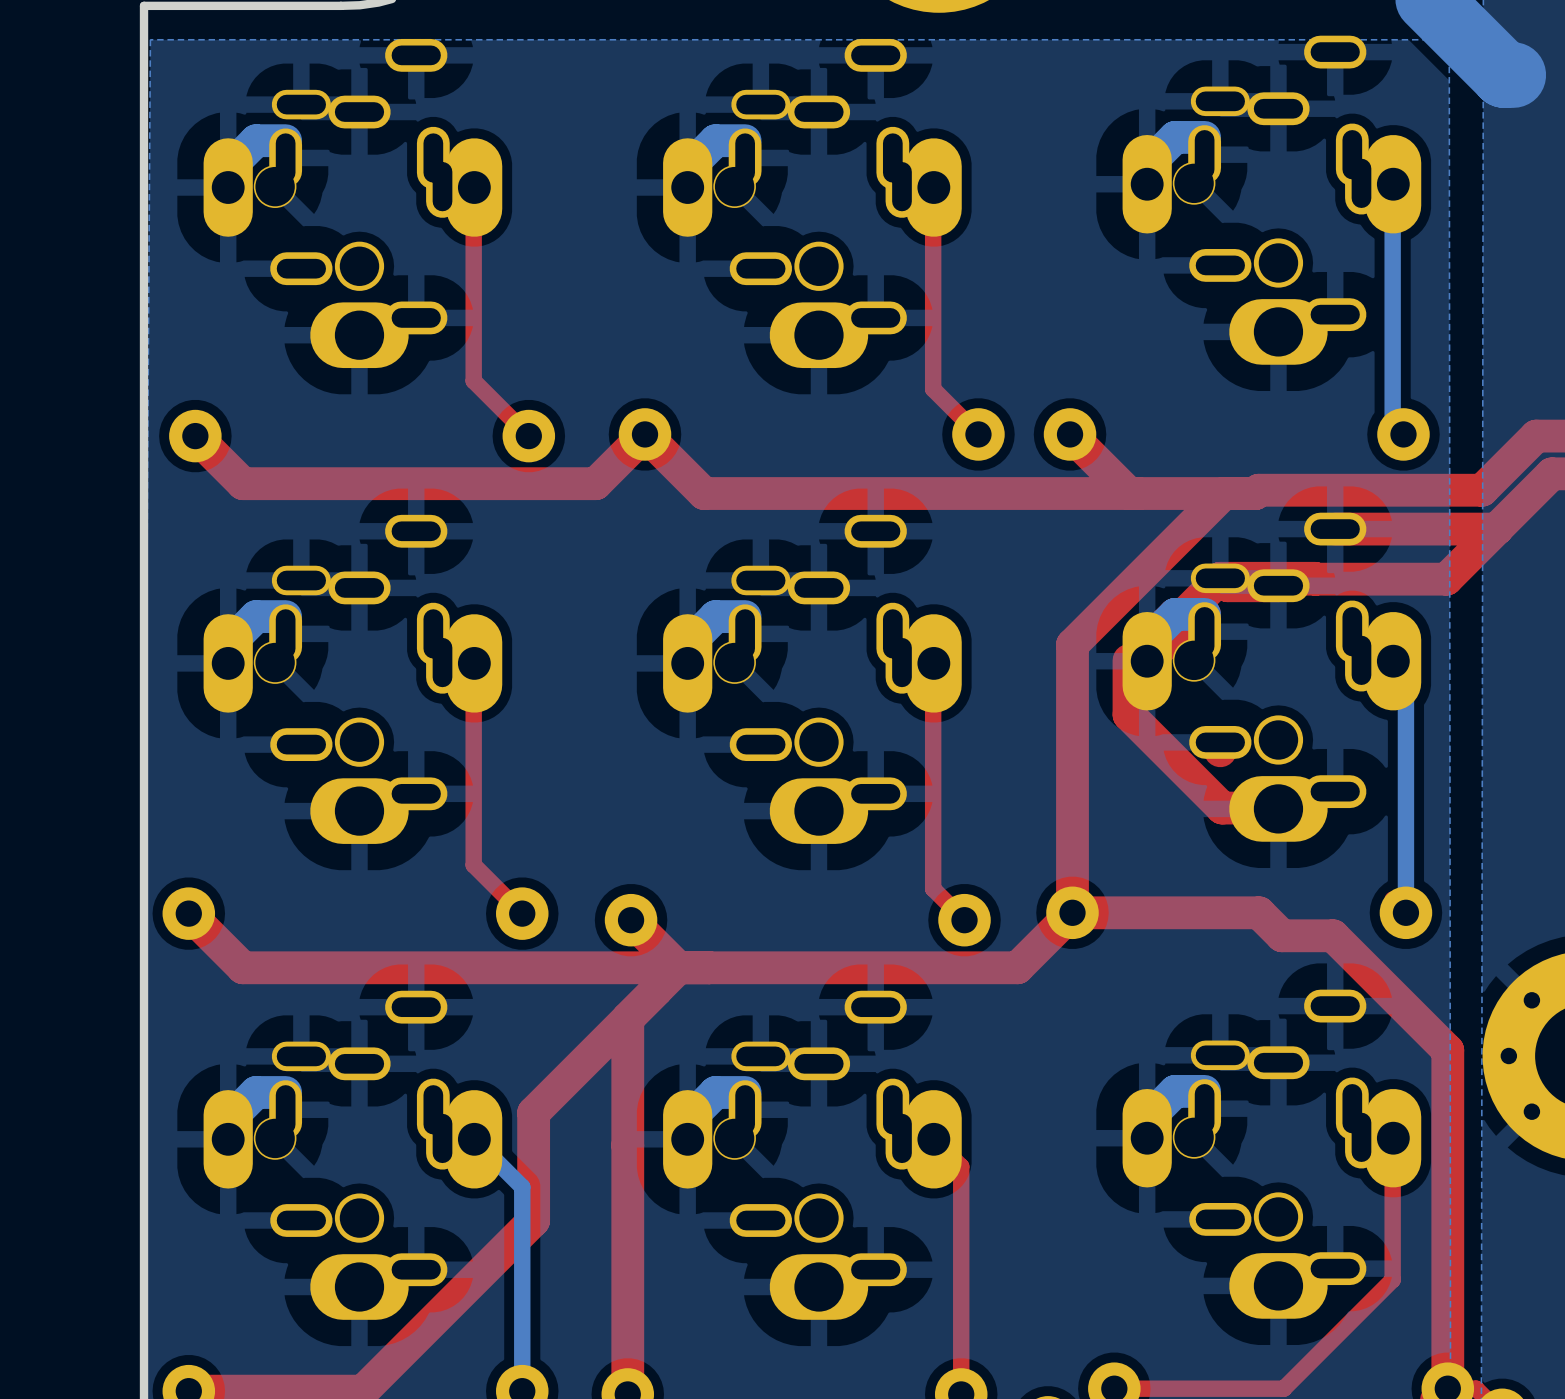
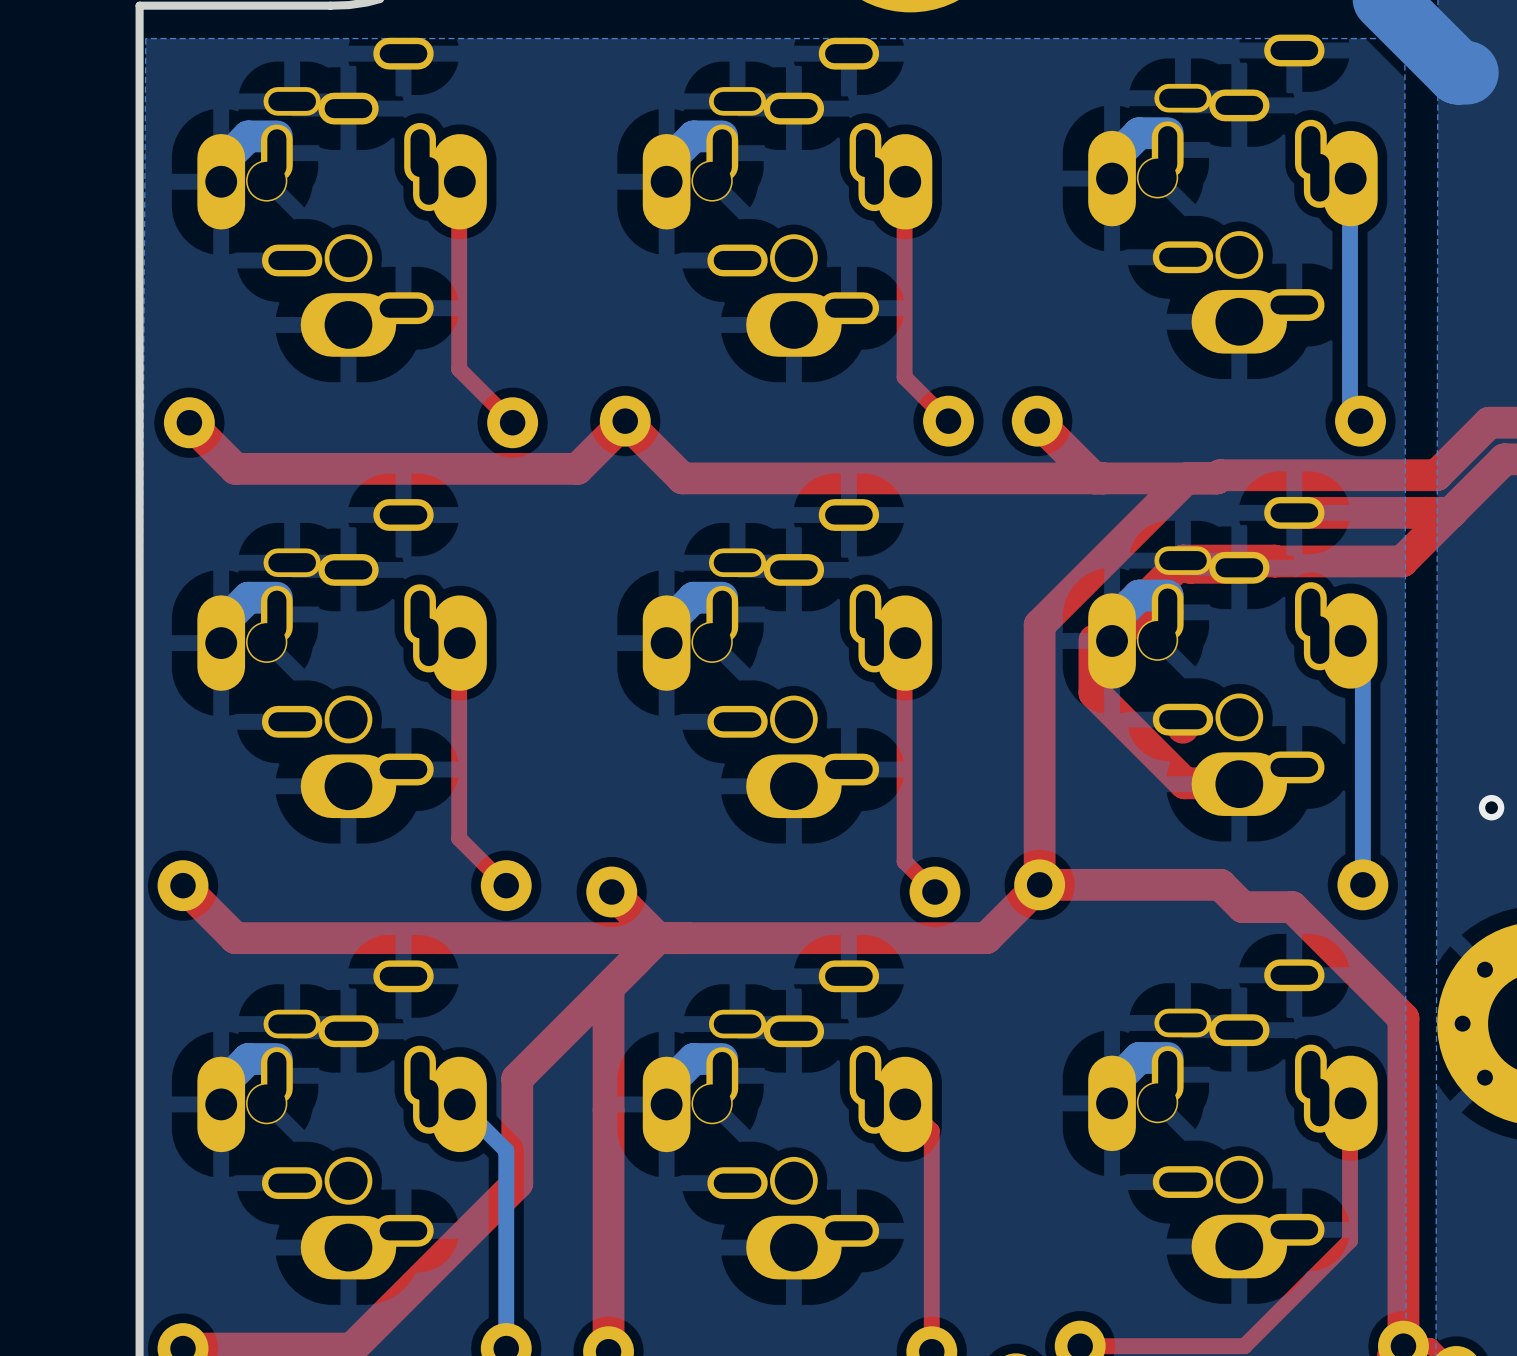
via: none -> (1491, 807)

